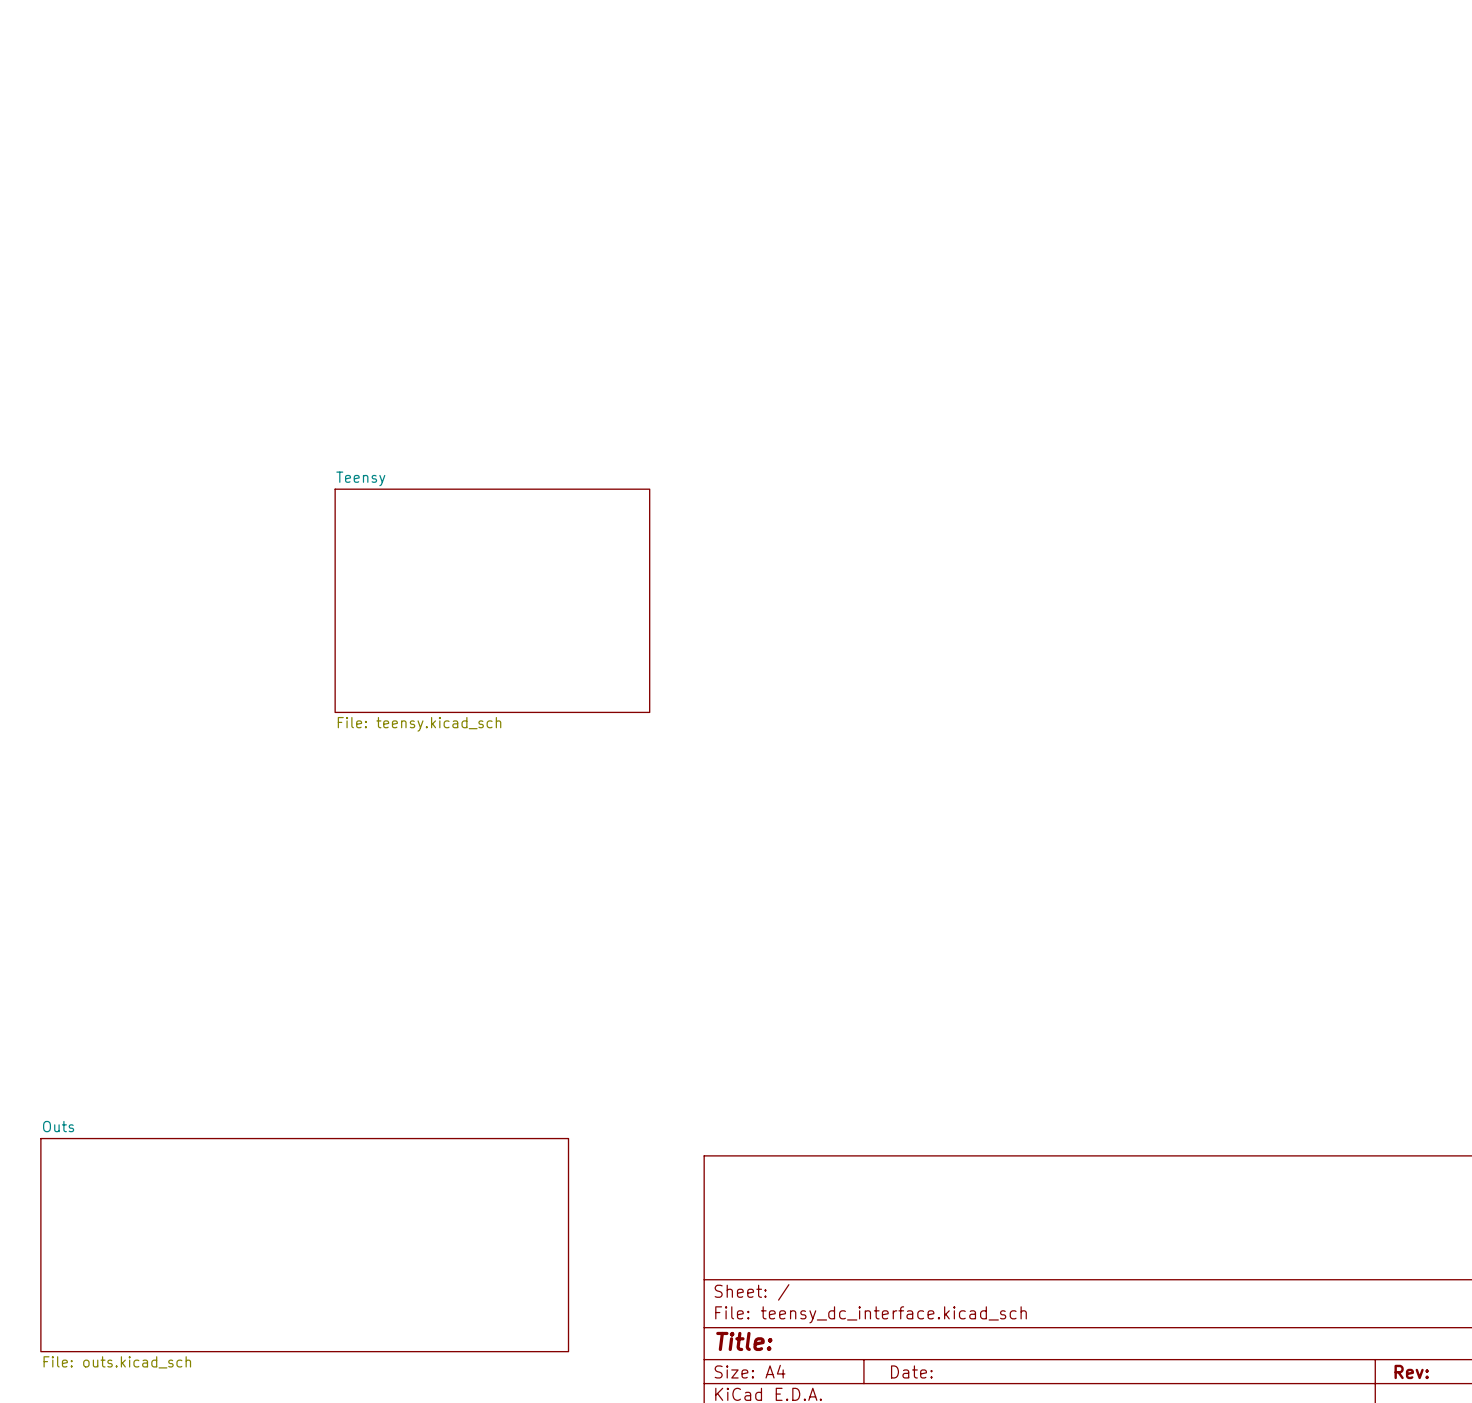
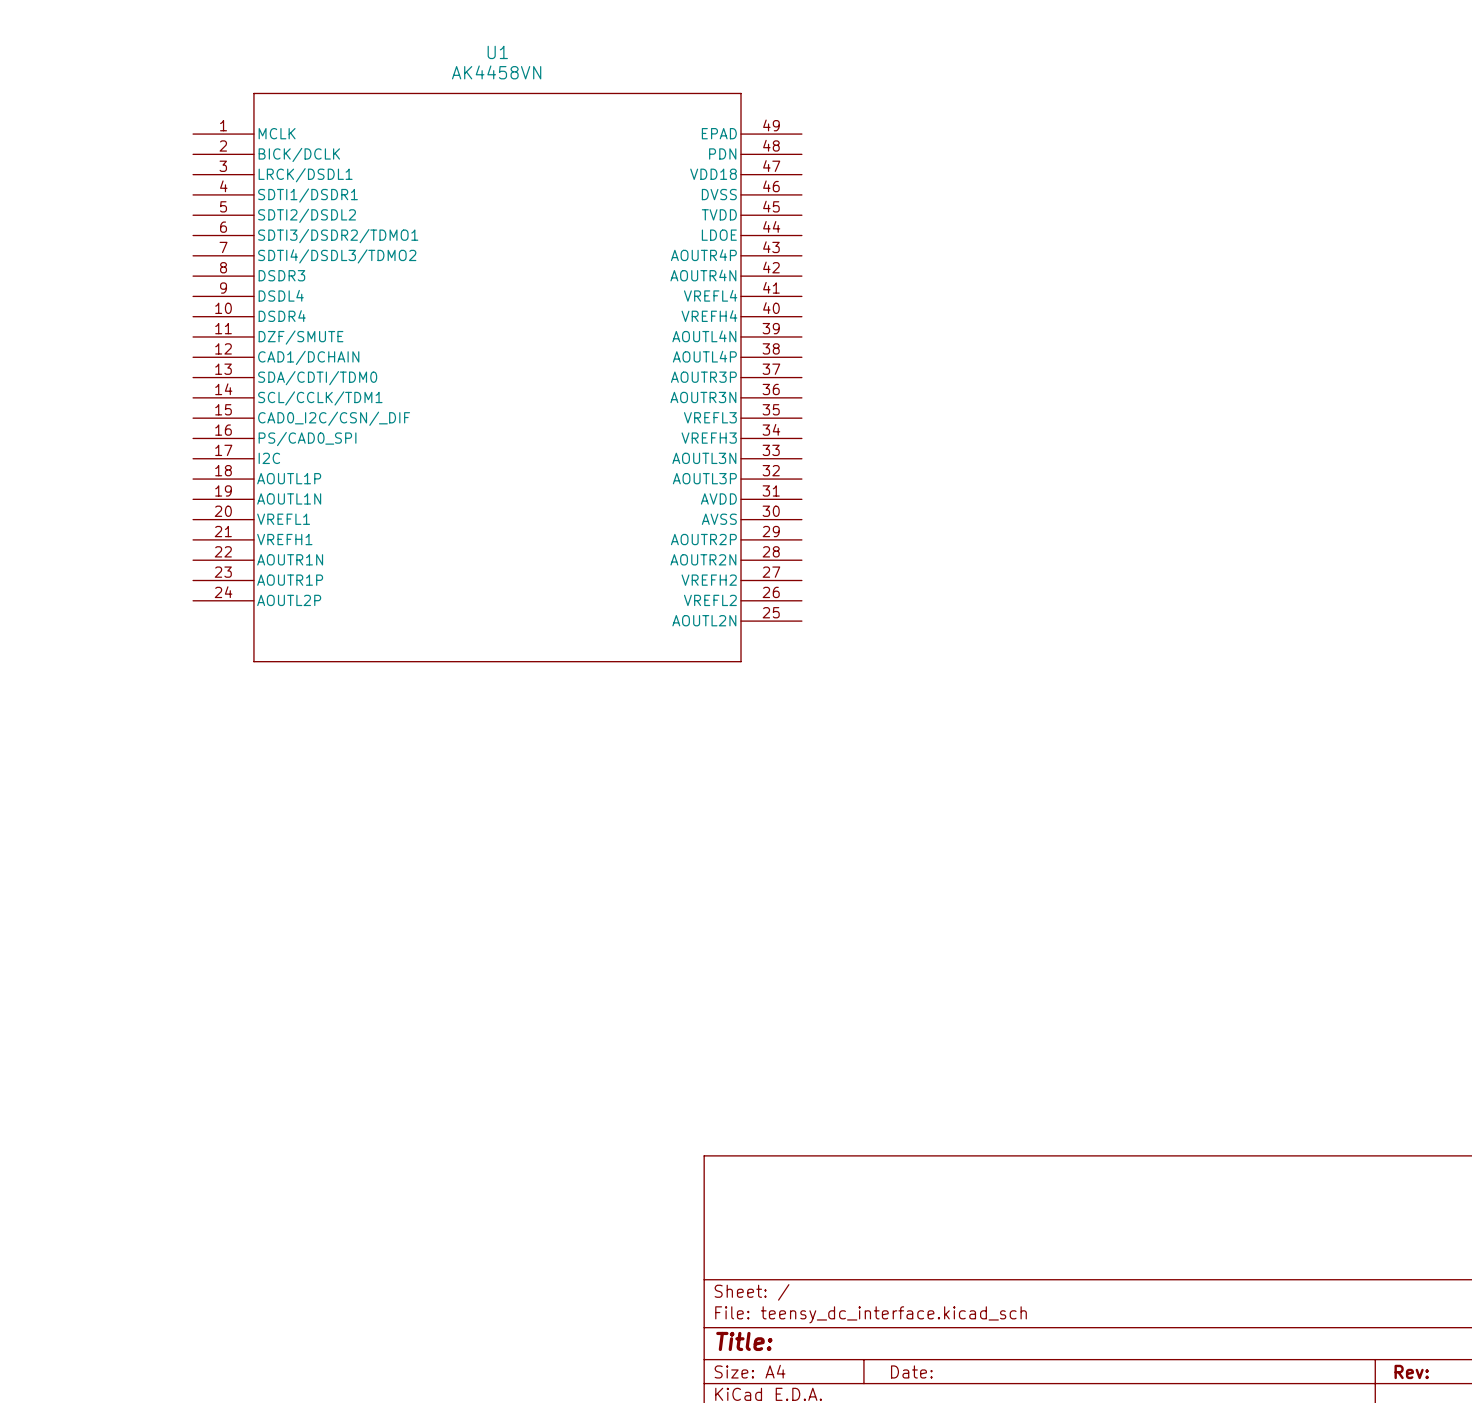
U1: none -> AK4458VN (497, 377)
sheet Teensy: File: teensy.kicad_sch (492, 600) -> none
sheet Outs: File: outs.kicad_sch (304, 1245) -> none

